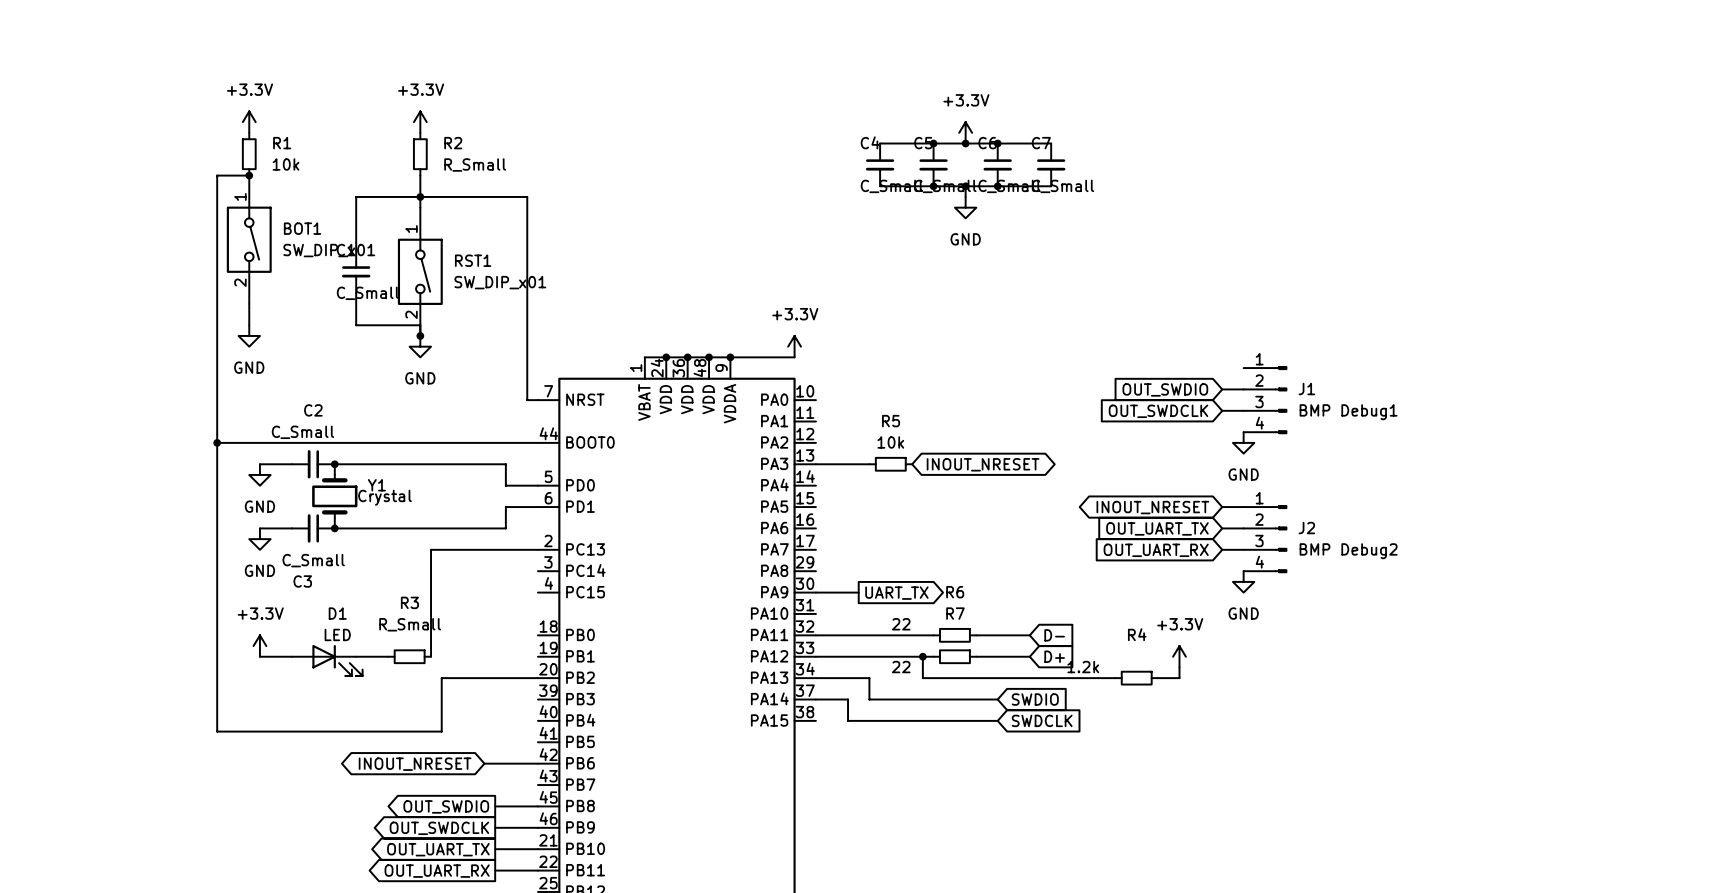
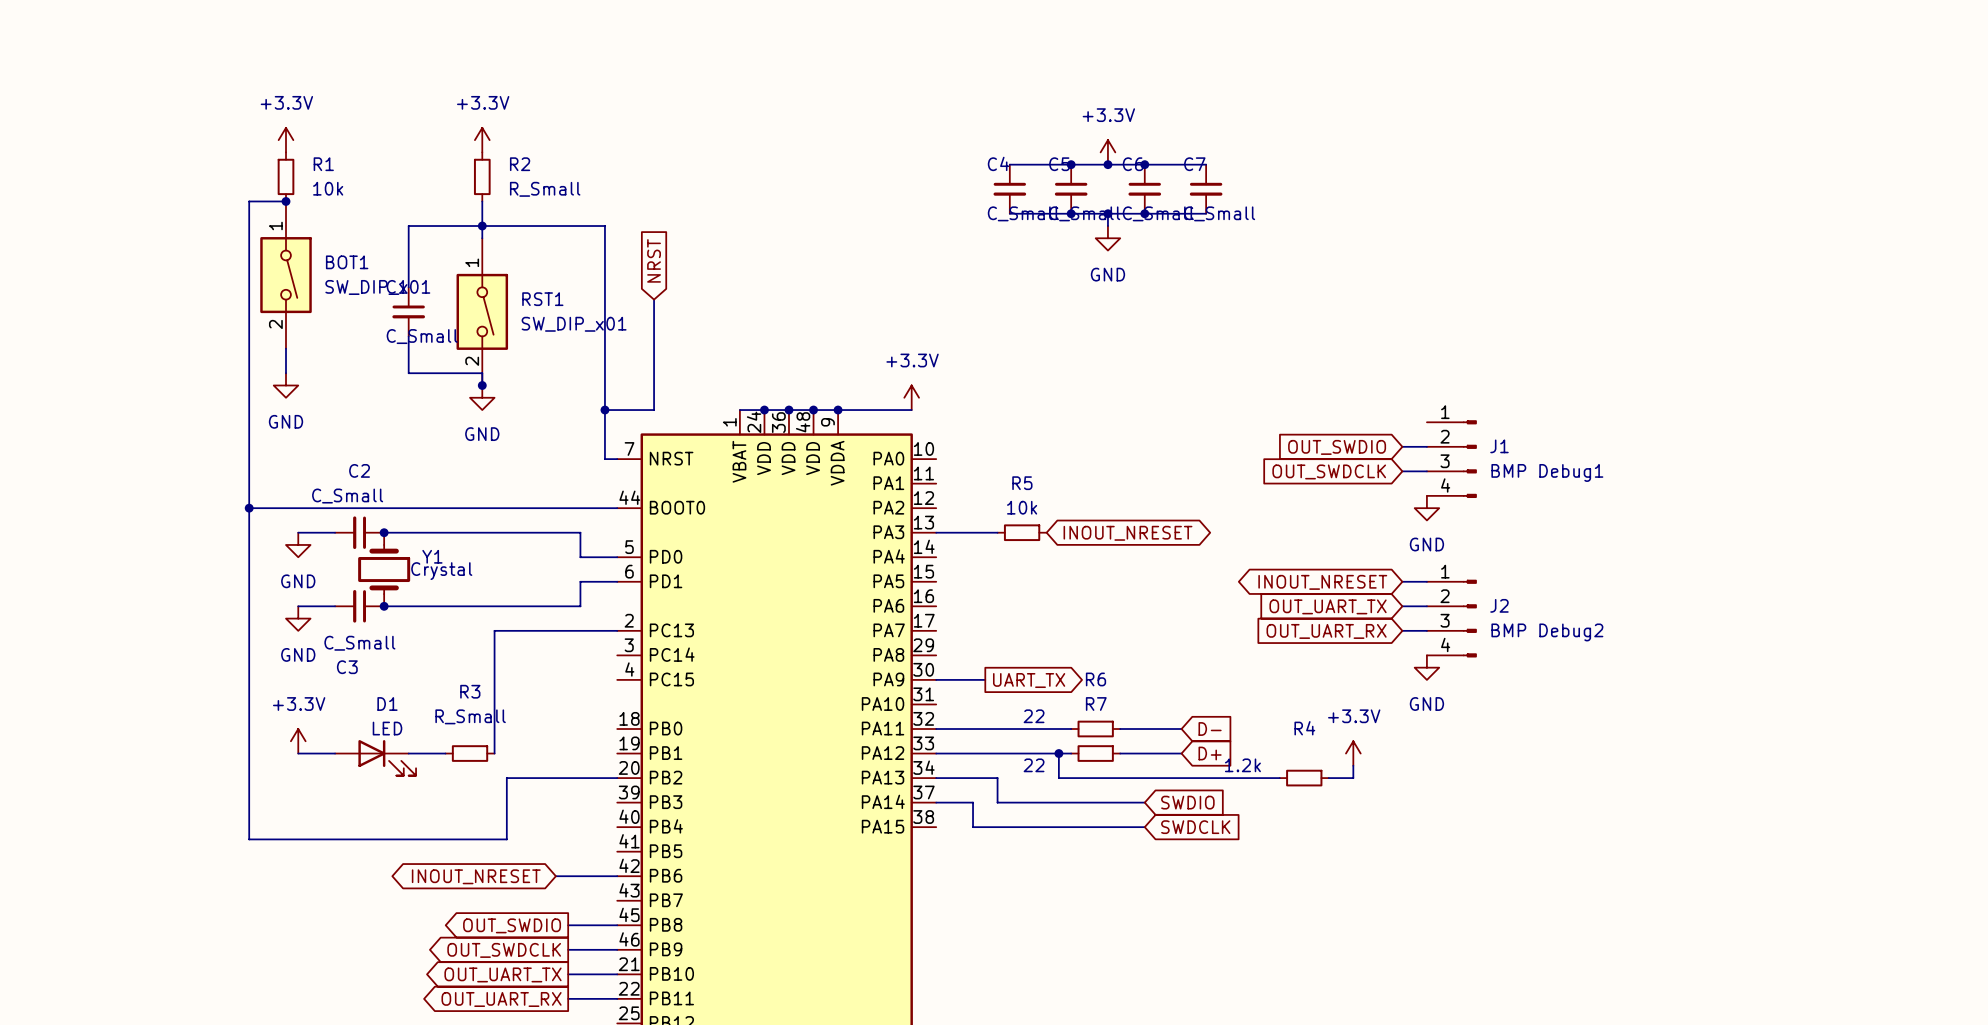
global label: none -> NRST (654, 260)
wire: none -> (654, 299) (654, 410) (604, 410)
junction: none -> (604, 410)

